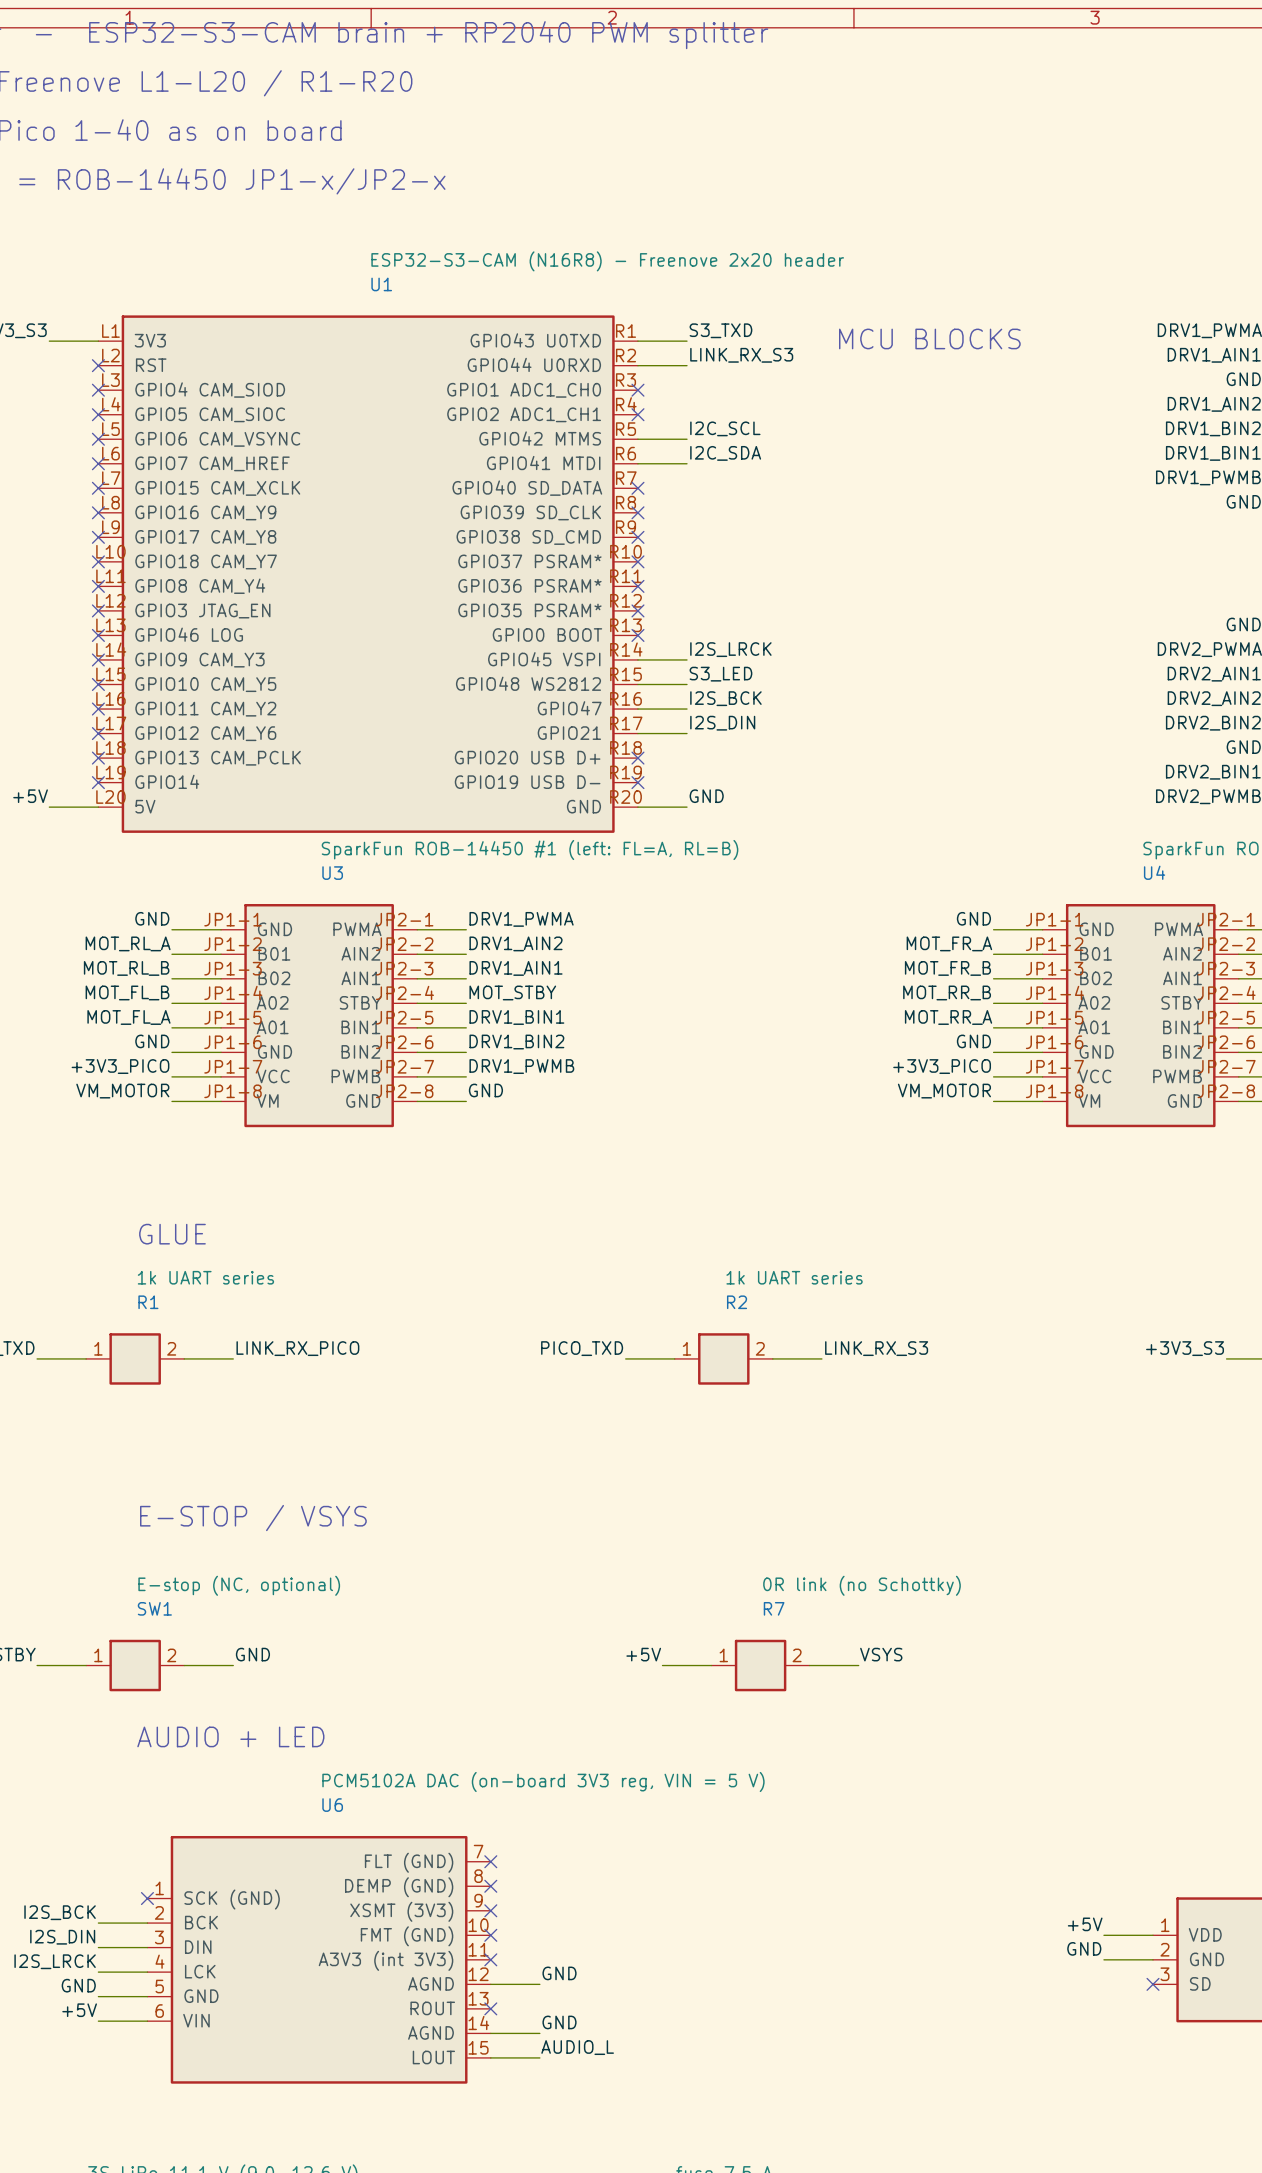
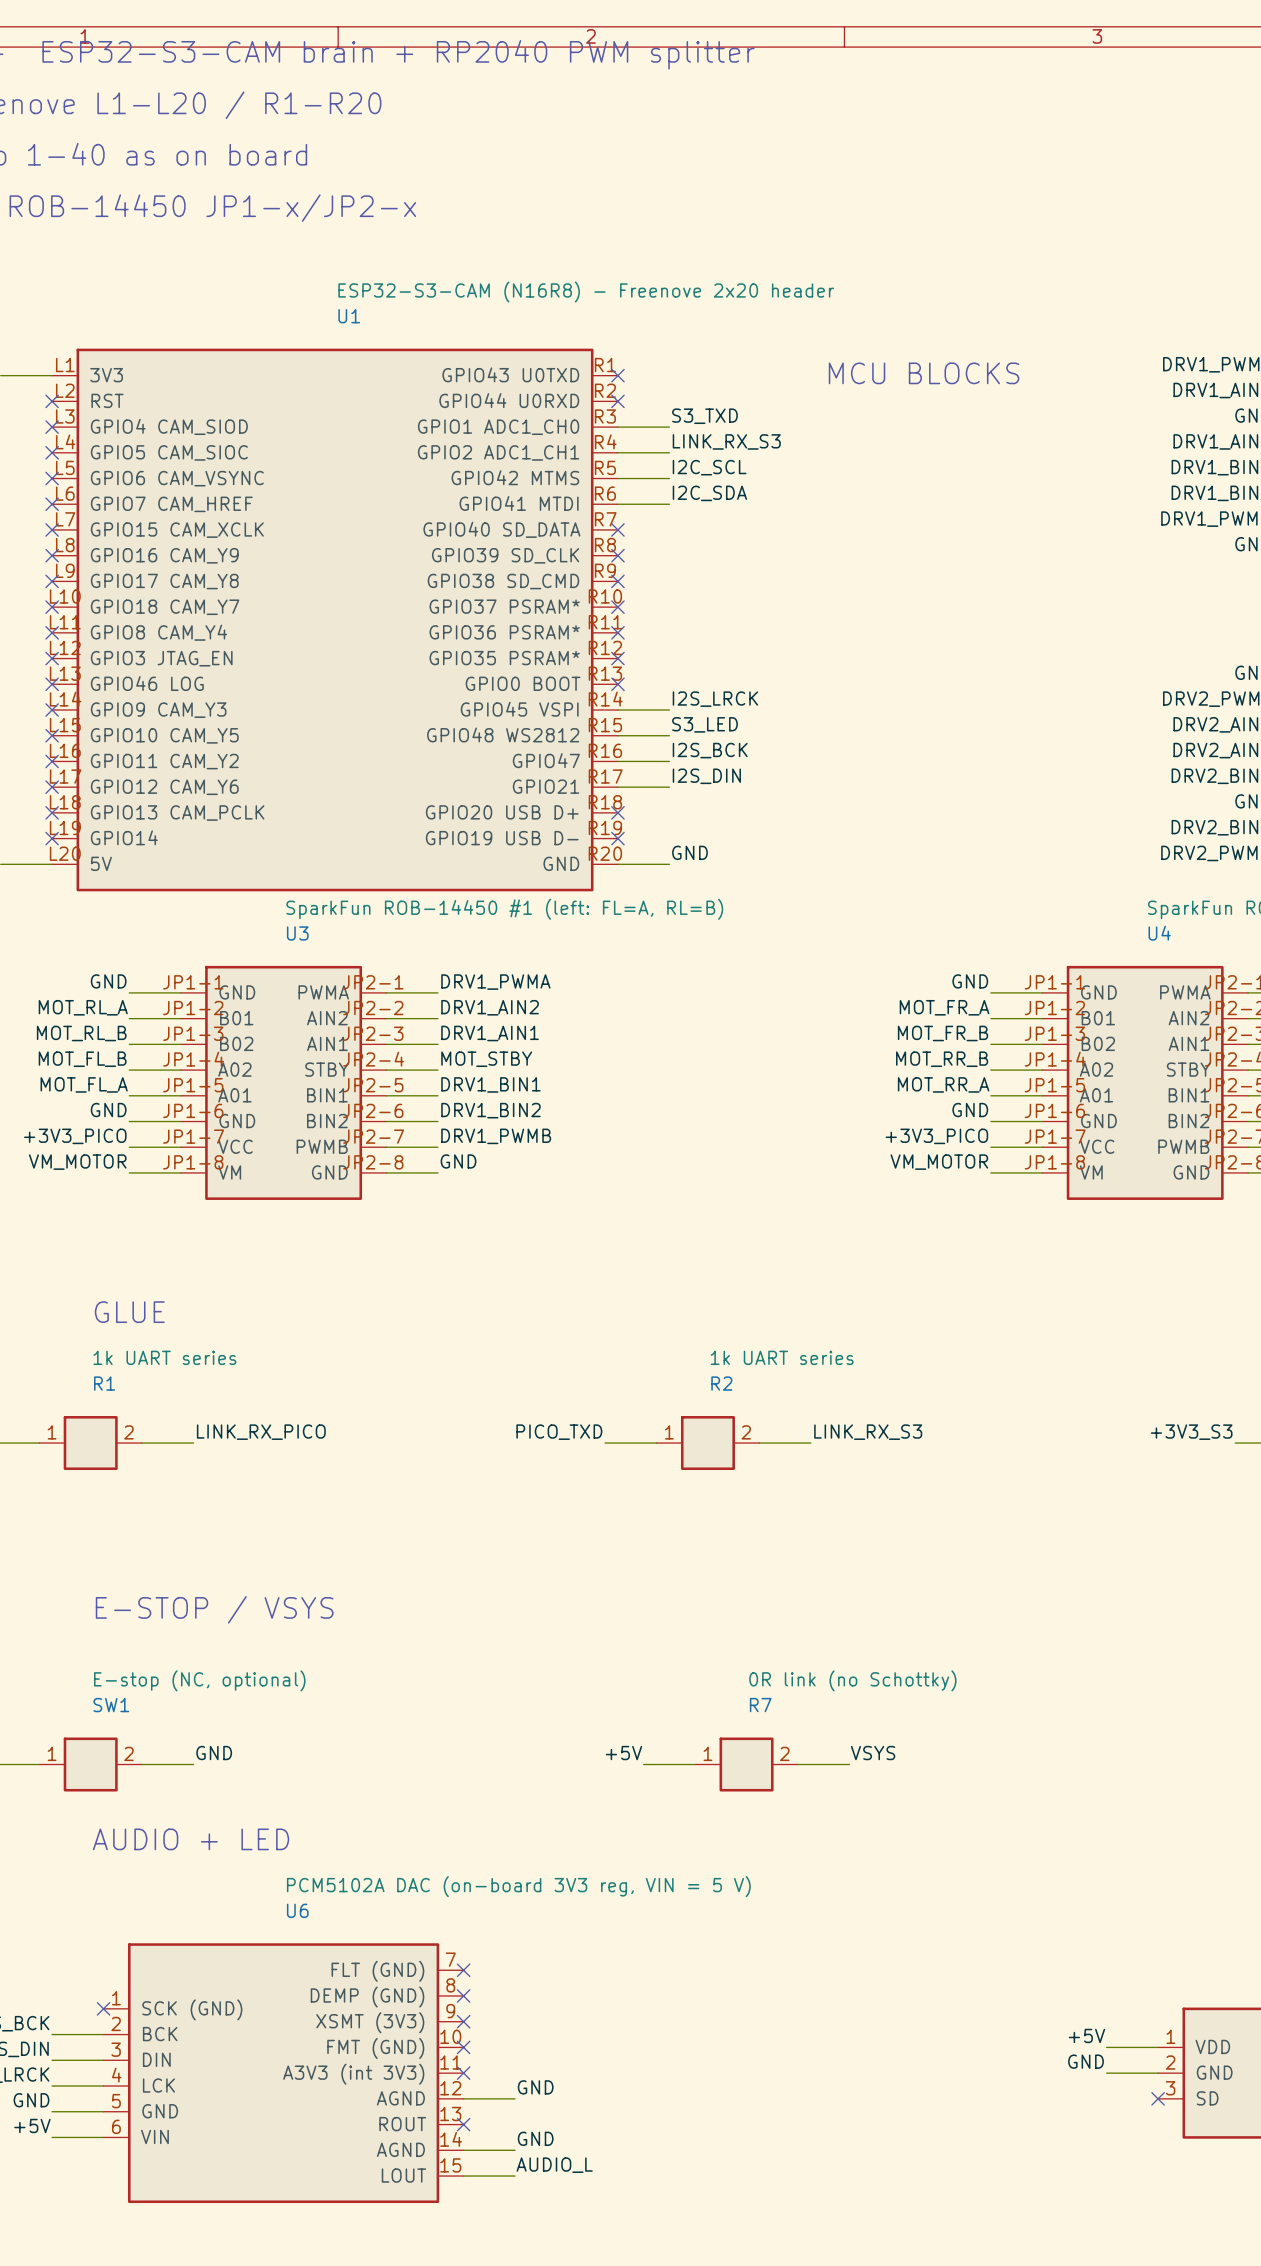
label position: S3_TXD (720, 330) -> S3_TXD (705, 416)
wire: (637, 341) (687, 341) -> (617, 427) (669, 427)
no-connect mark: none -> (617, 375)
label position: LINK_RX_S3 (741, 355) -> LINK_RX_S3 (726, 441)
wire: (637, 365) (687, 365) -> (617, 452) (669, 452)
no-connect mark: none -> (617, 401)
no-connect mark: (637, 390) -> none
no-connect mark: (637, 414) -> none

